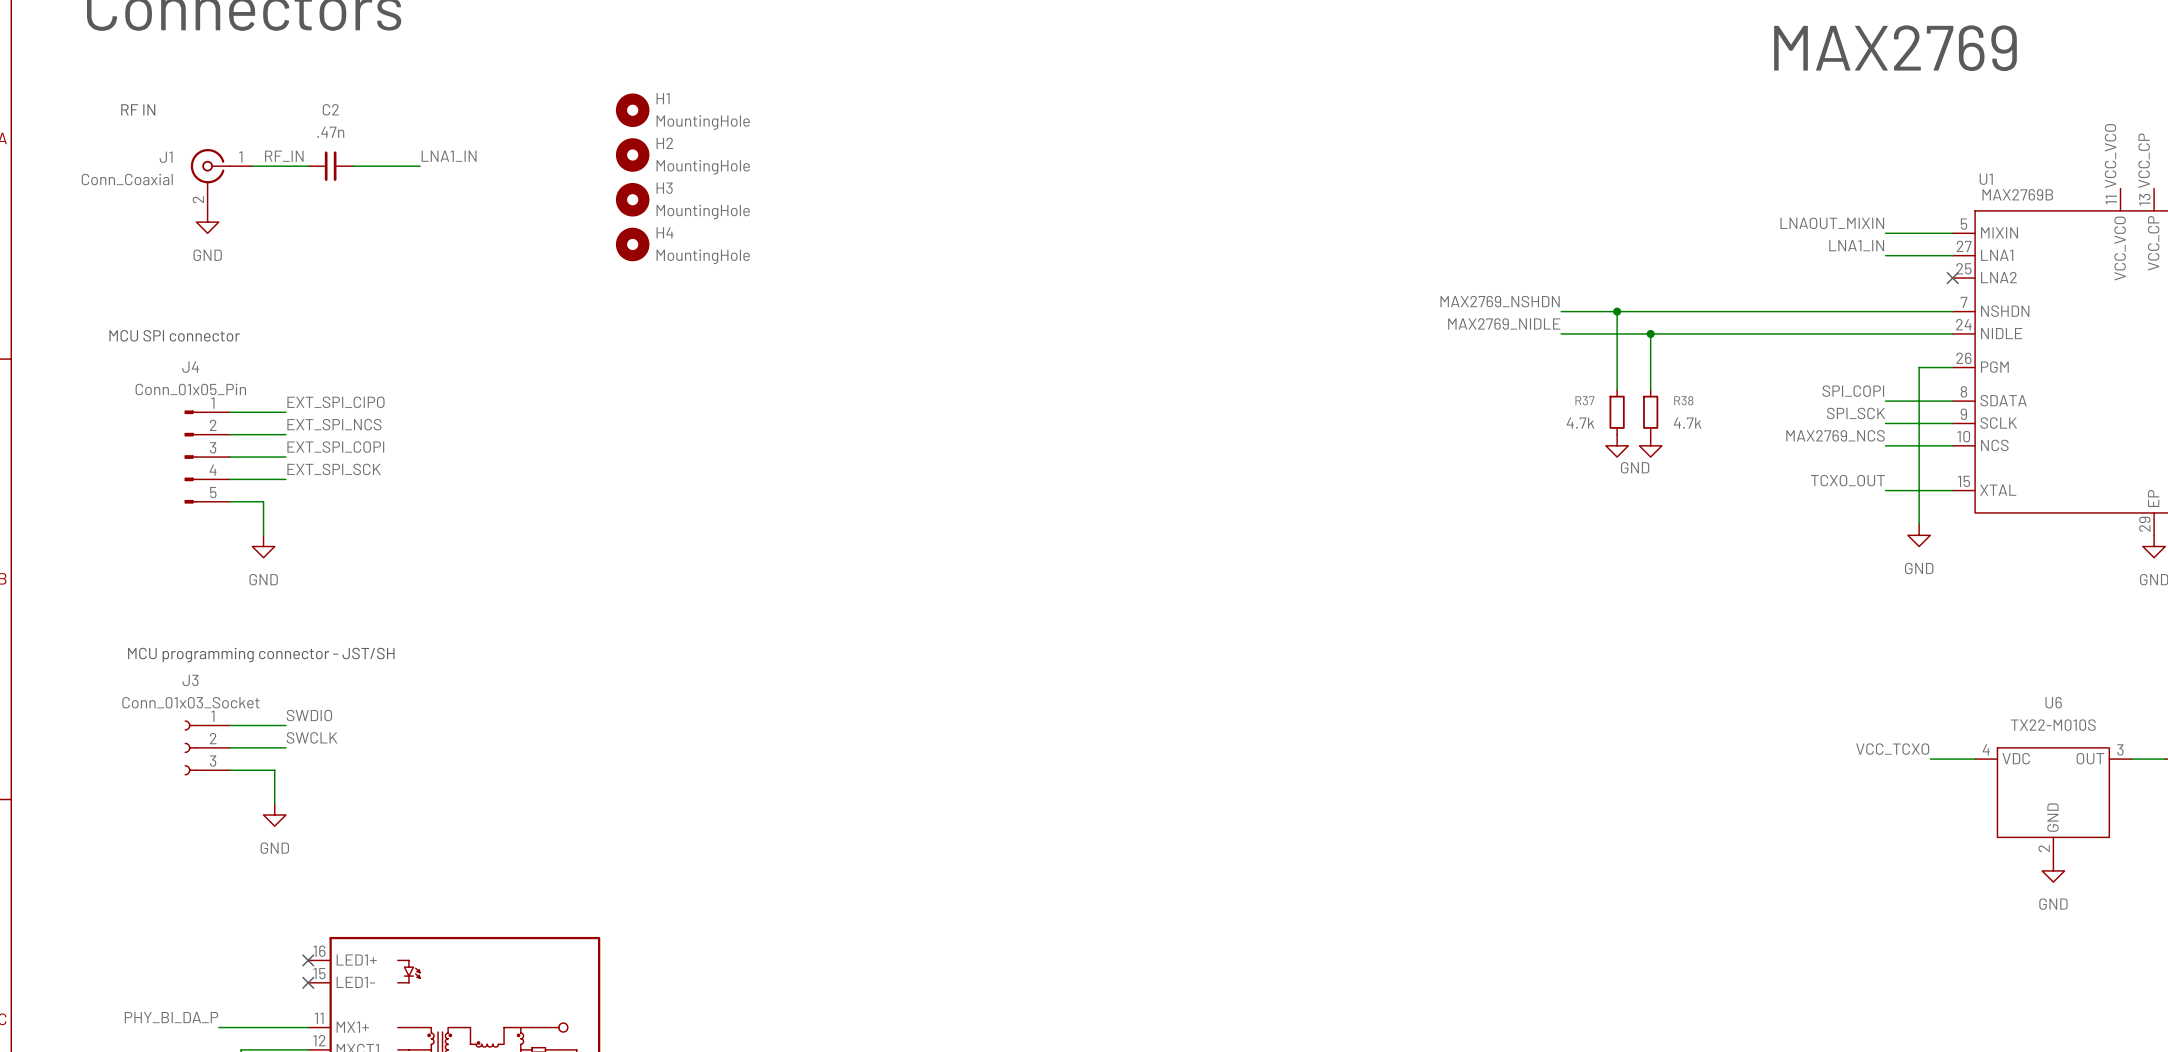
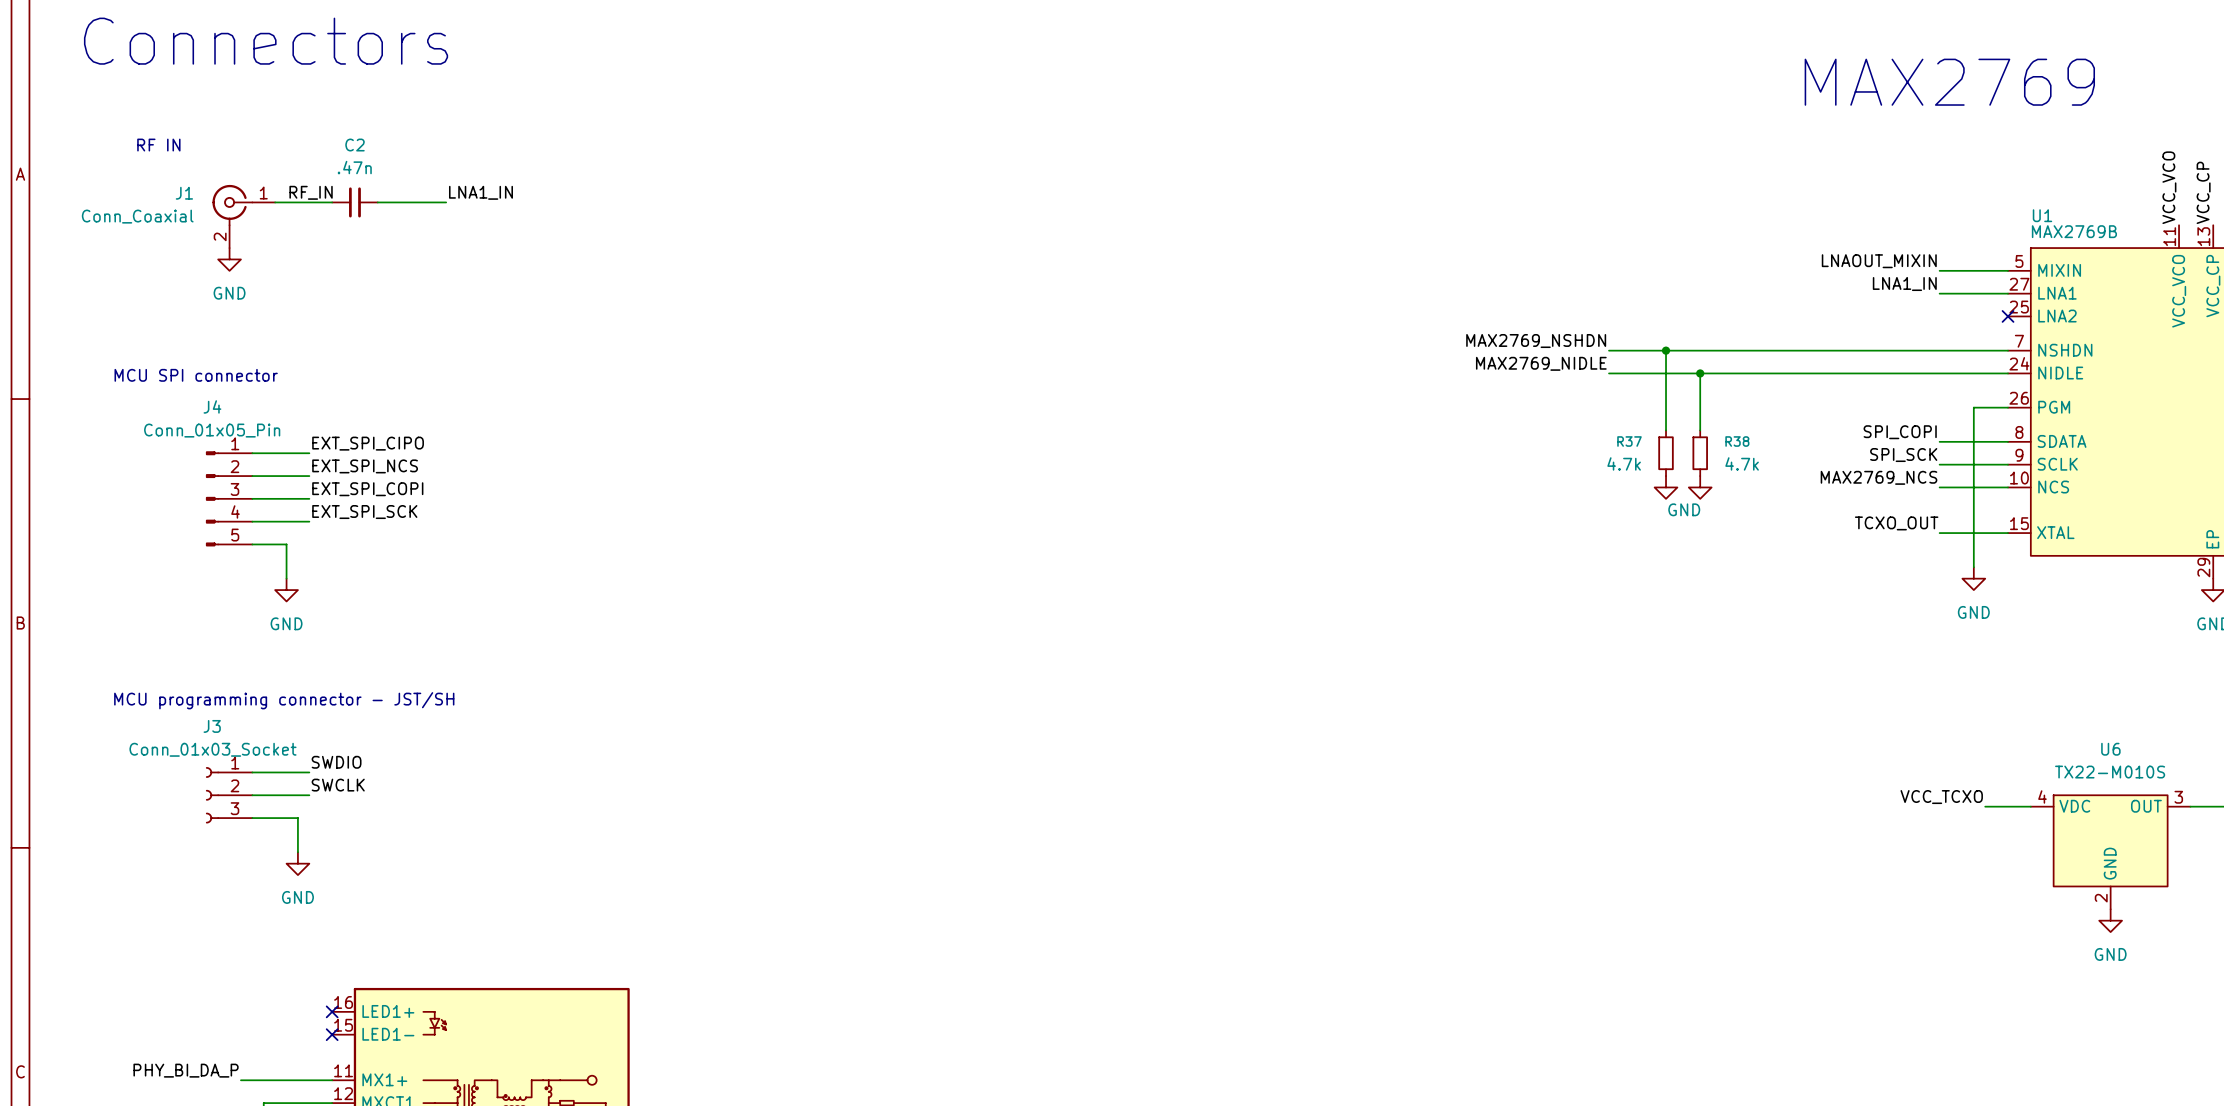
H1: MountingHole (632, 110) -> none
H2: MountingHole (632, 154) -> none
H3: MountingHole (632, 199) -> none
H4: MountingHole (632, 244) -> none

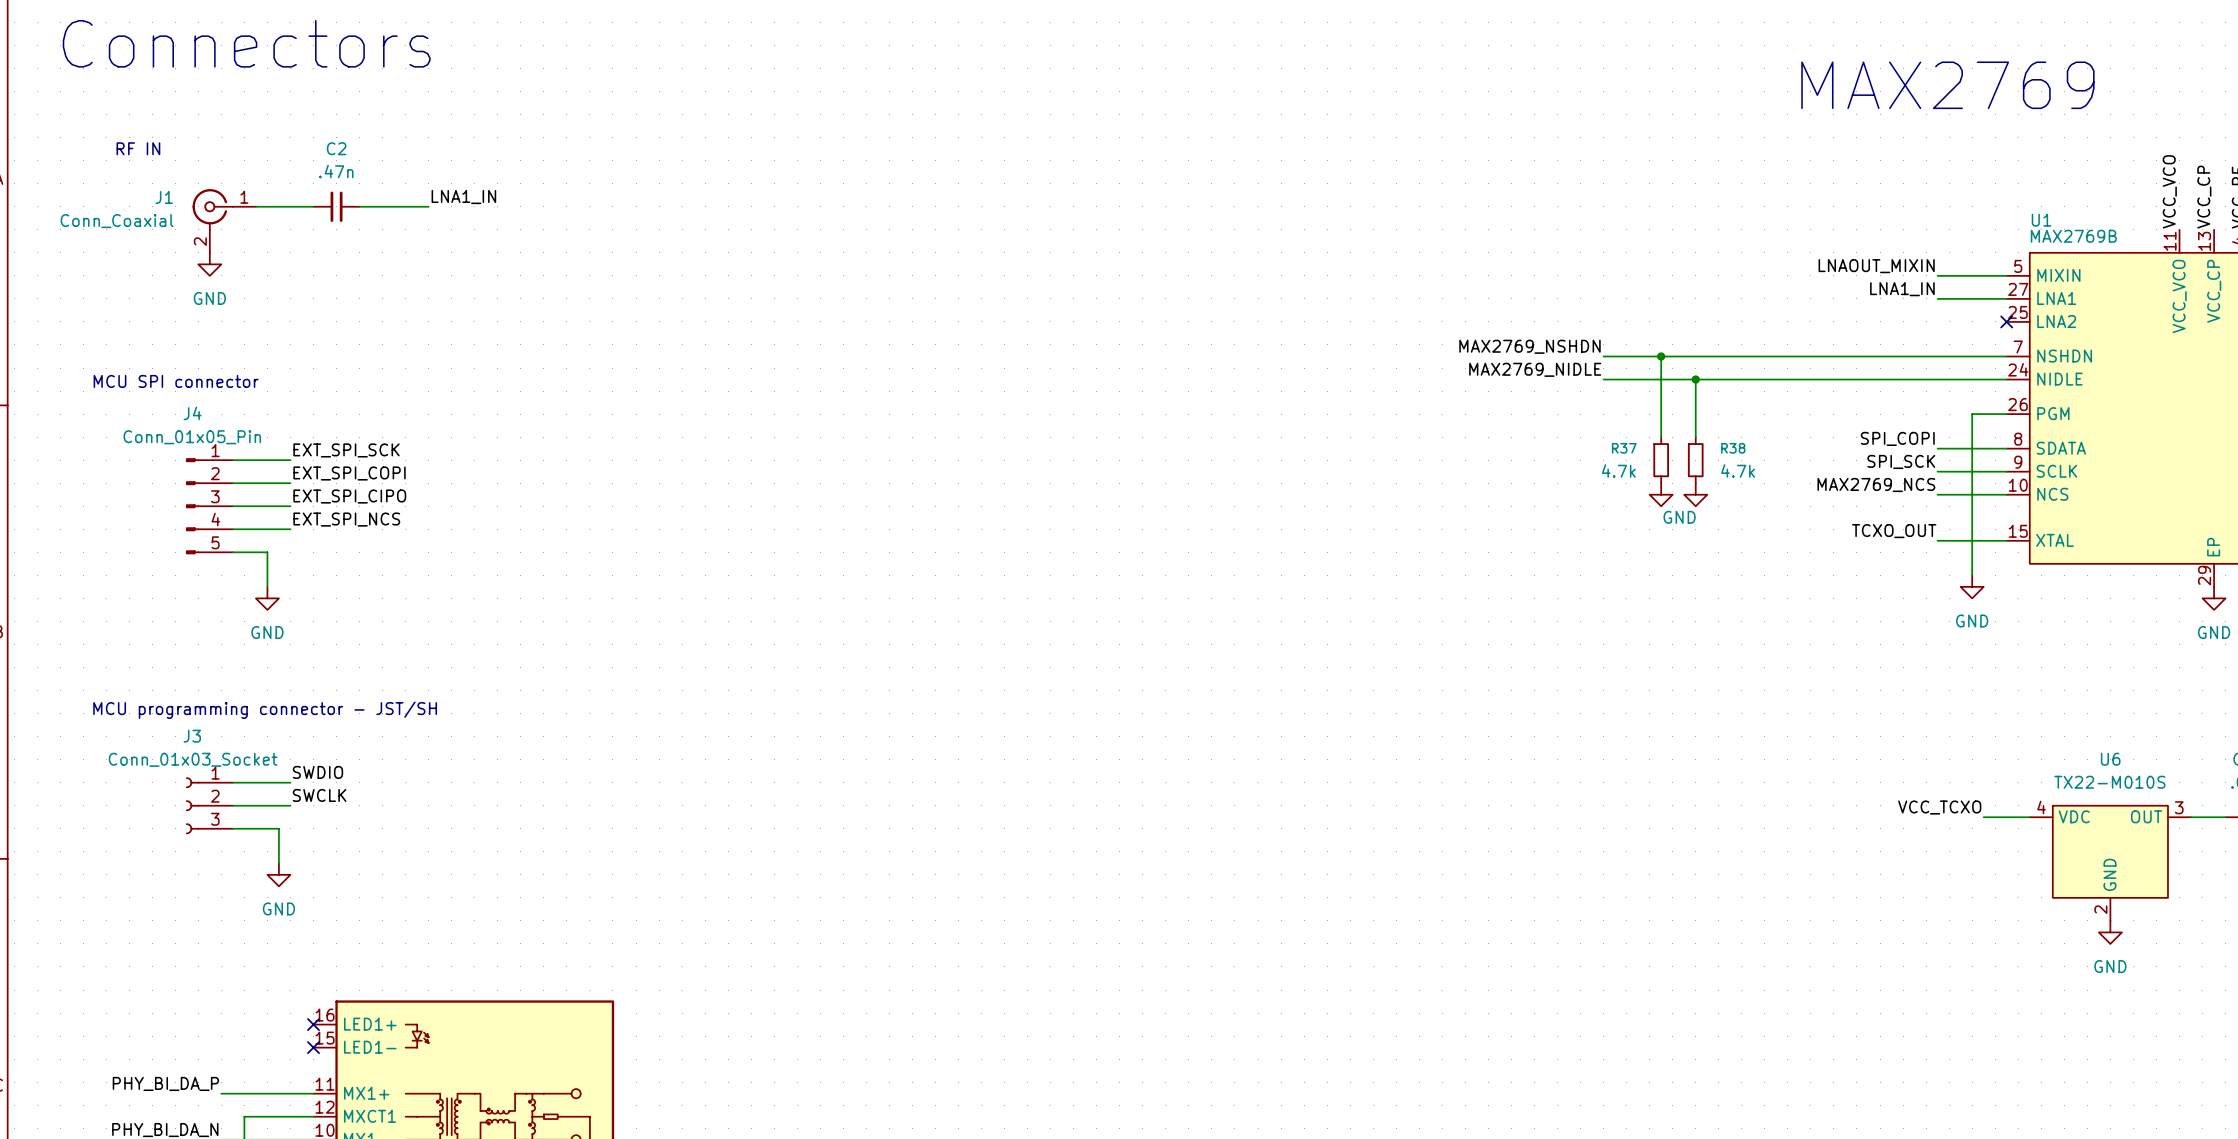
label: RF_IN (311, 192) -> none
label: EXT_SPI_CIPO (368, 443) -> EXT_SPI_SCK (346, 450)
label: EXT_SPI_NCS (365, 466) -> EXT_SPI_COPI (349, 473)
label: EXT_SPI_COPI (367, 489) -> EXT_SPI_CIPO (349, 496)
label: EXT_SPI_SCK (364, 512) -> EXT_SPI_NCS (346, 519)

